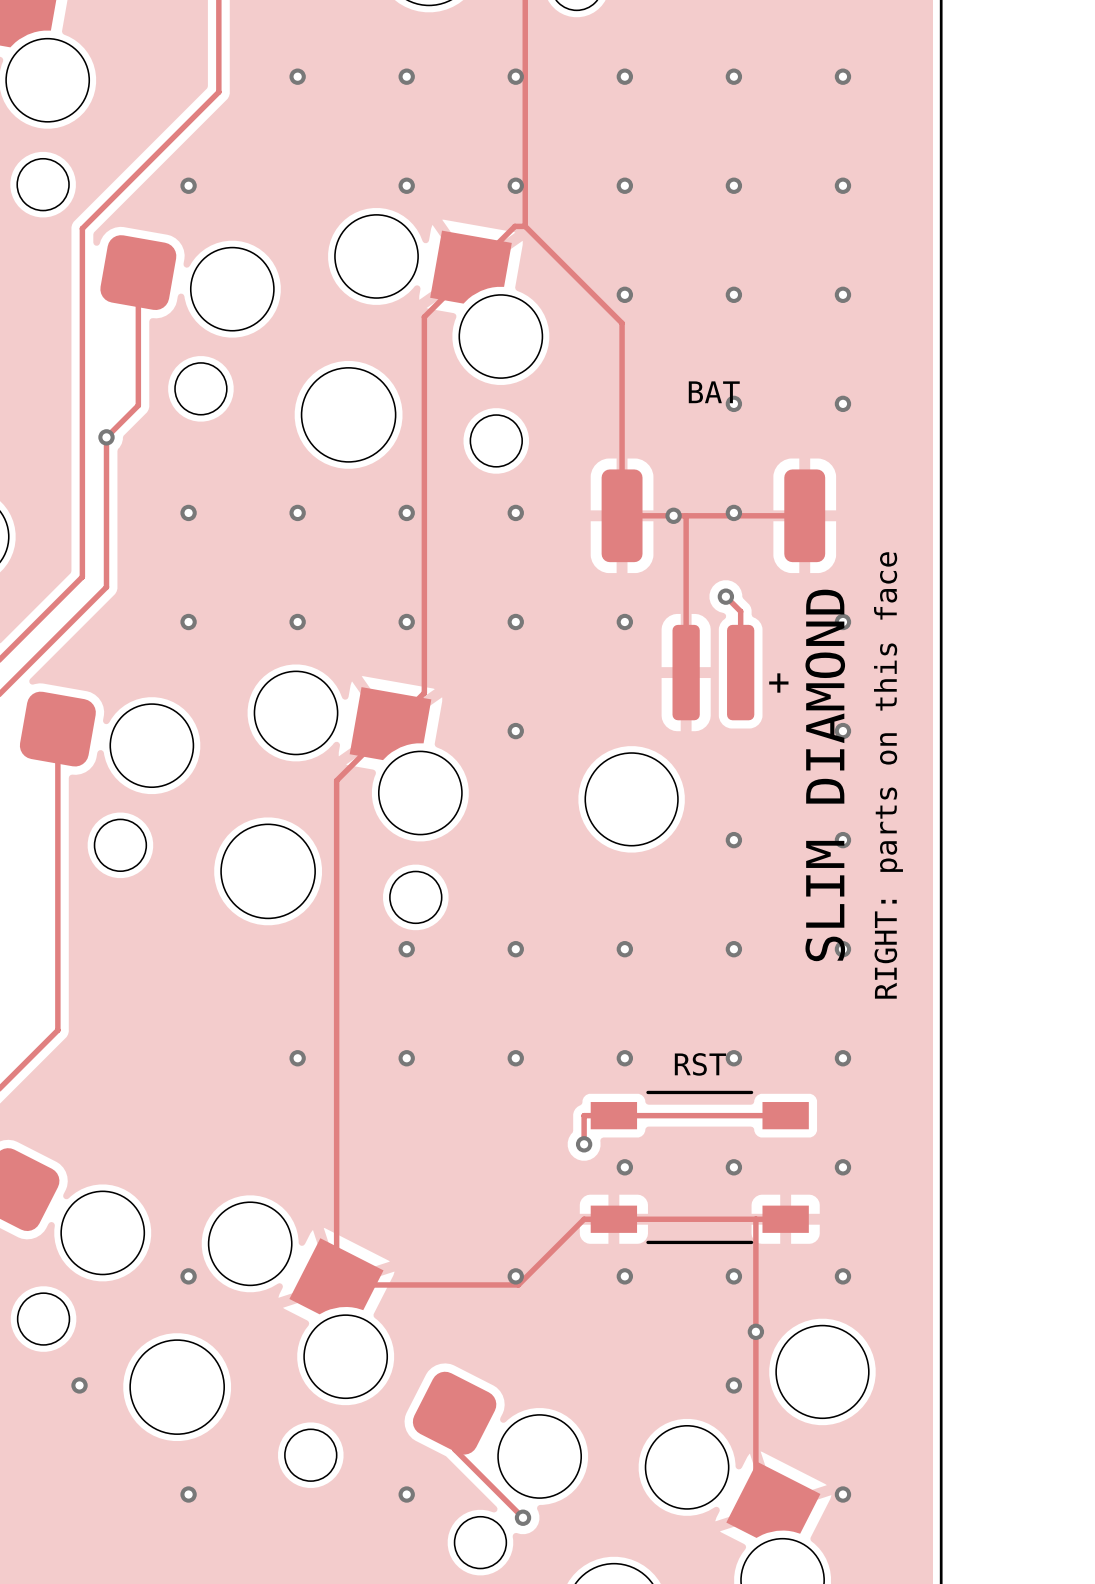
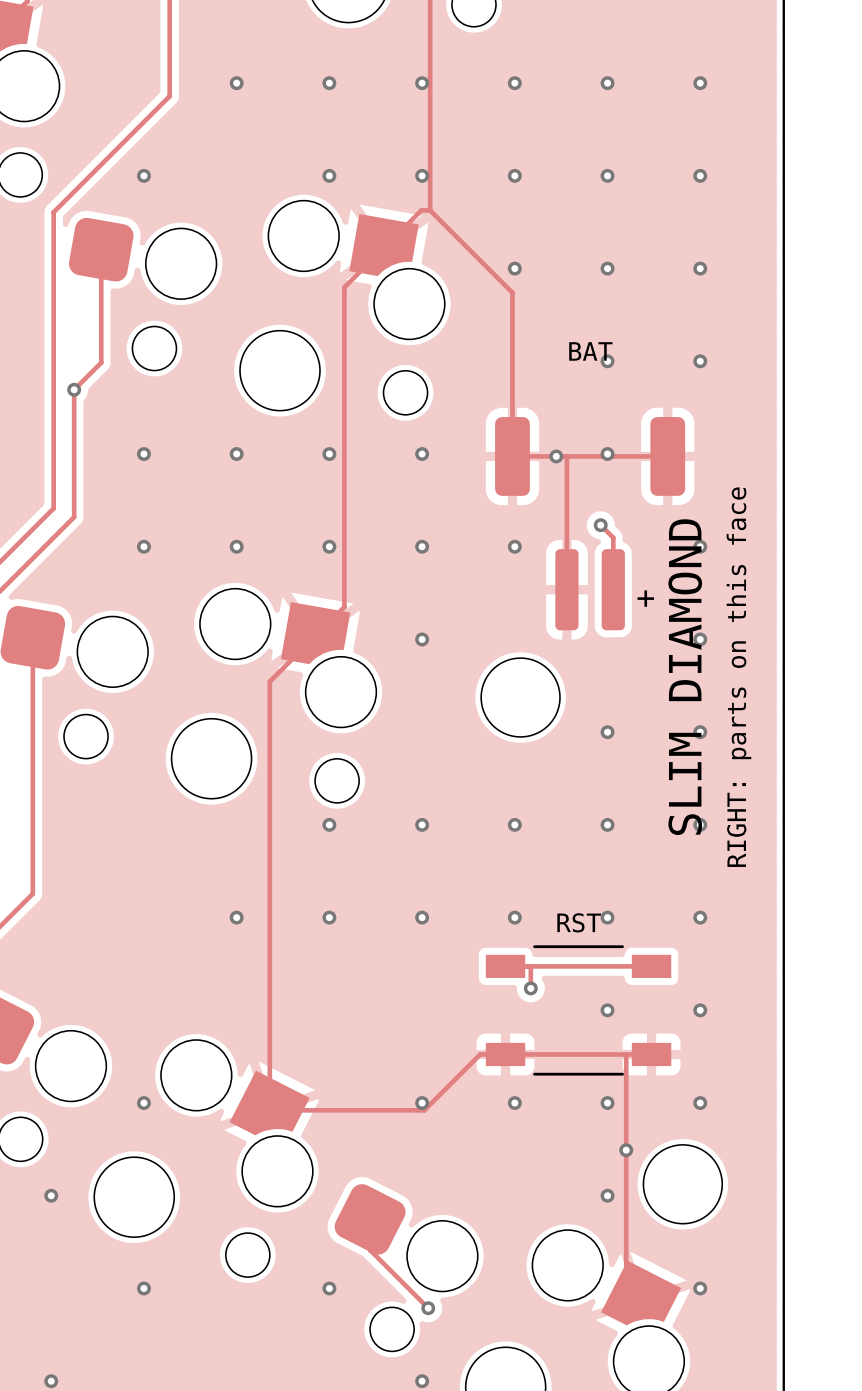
track: (613, 1115) (584, 1115) (584, 1144) -> none
track: none -> (530, 966) (530, 988)
via: none -> (530, 988)
via: (584, 1144) -> none
via: (624, 1167) -> none

